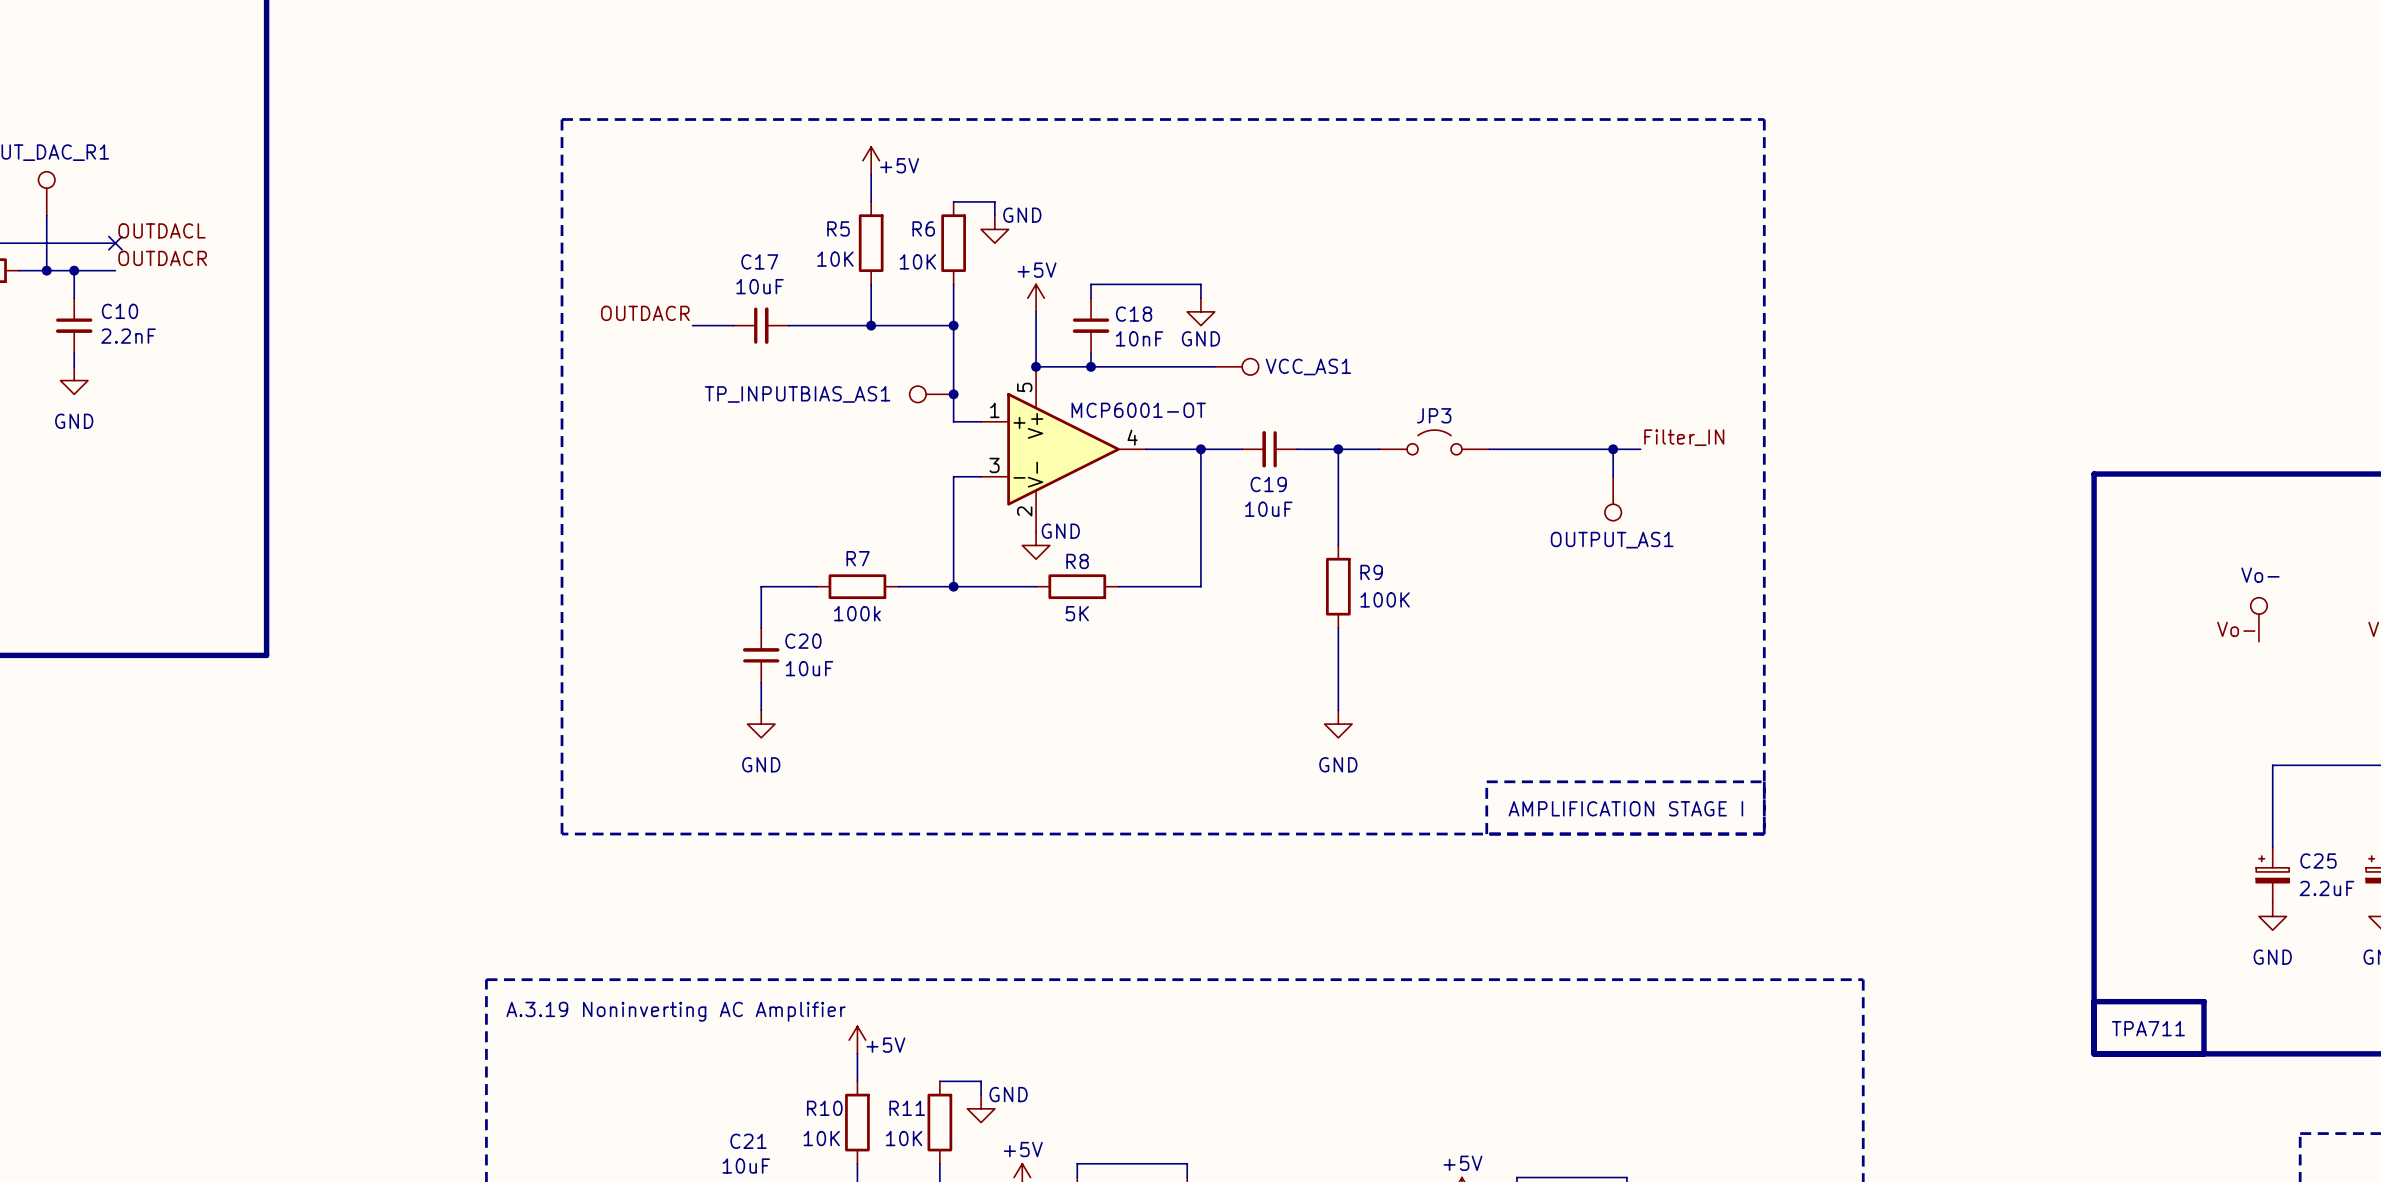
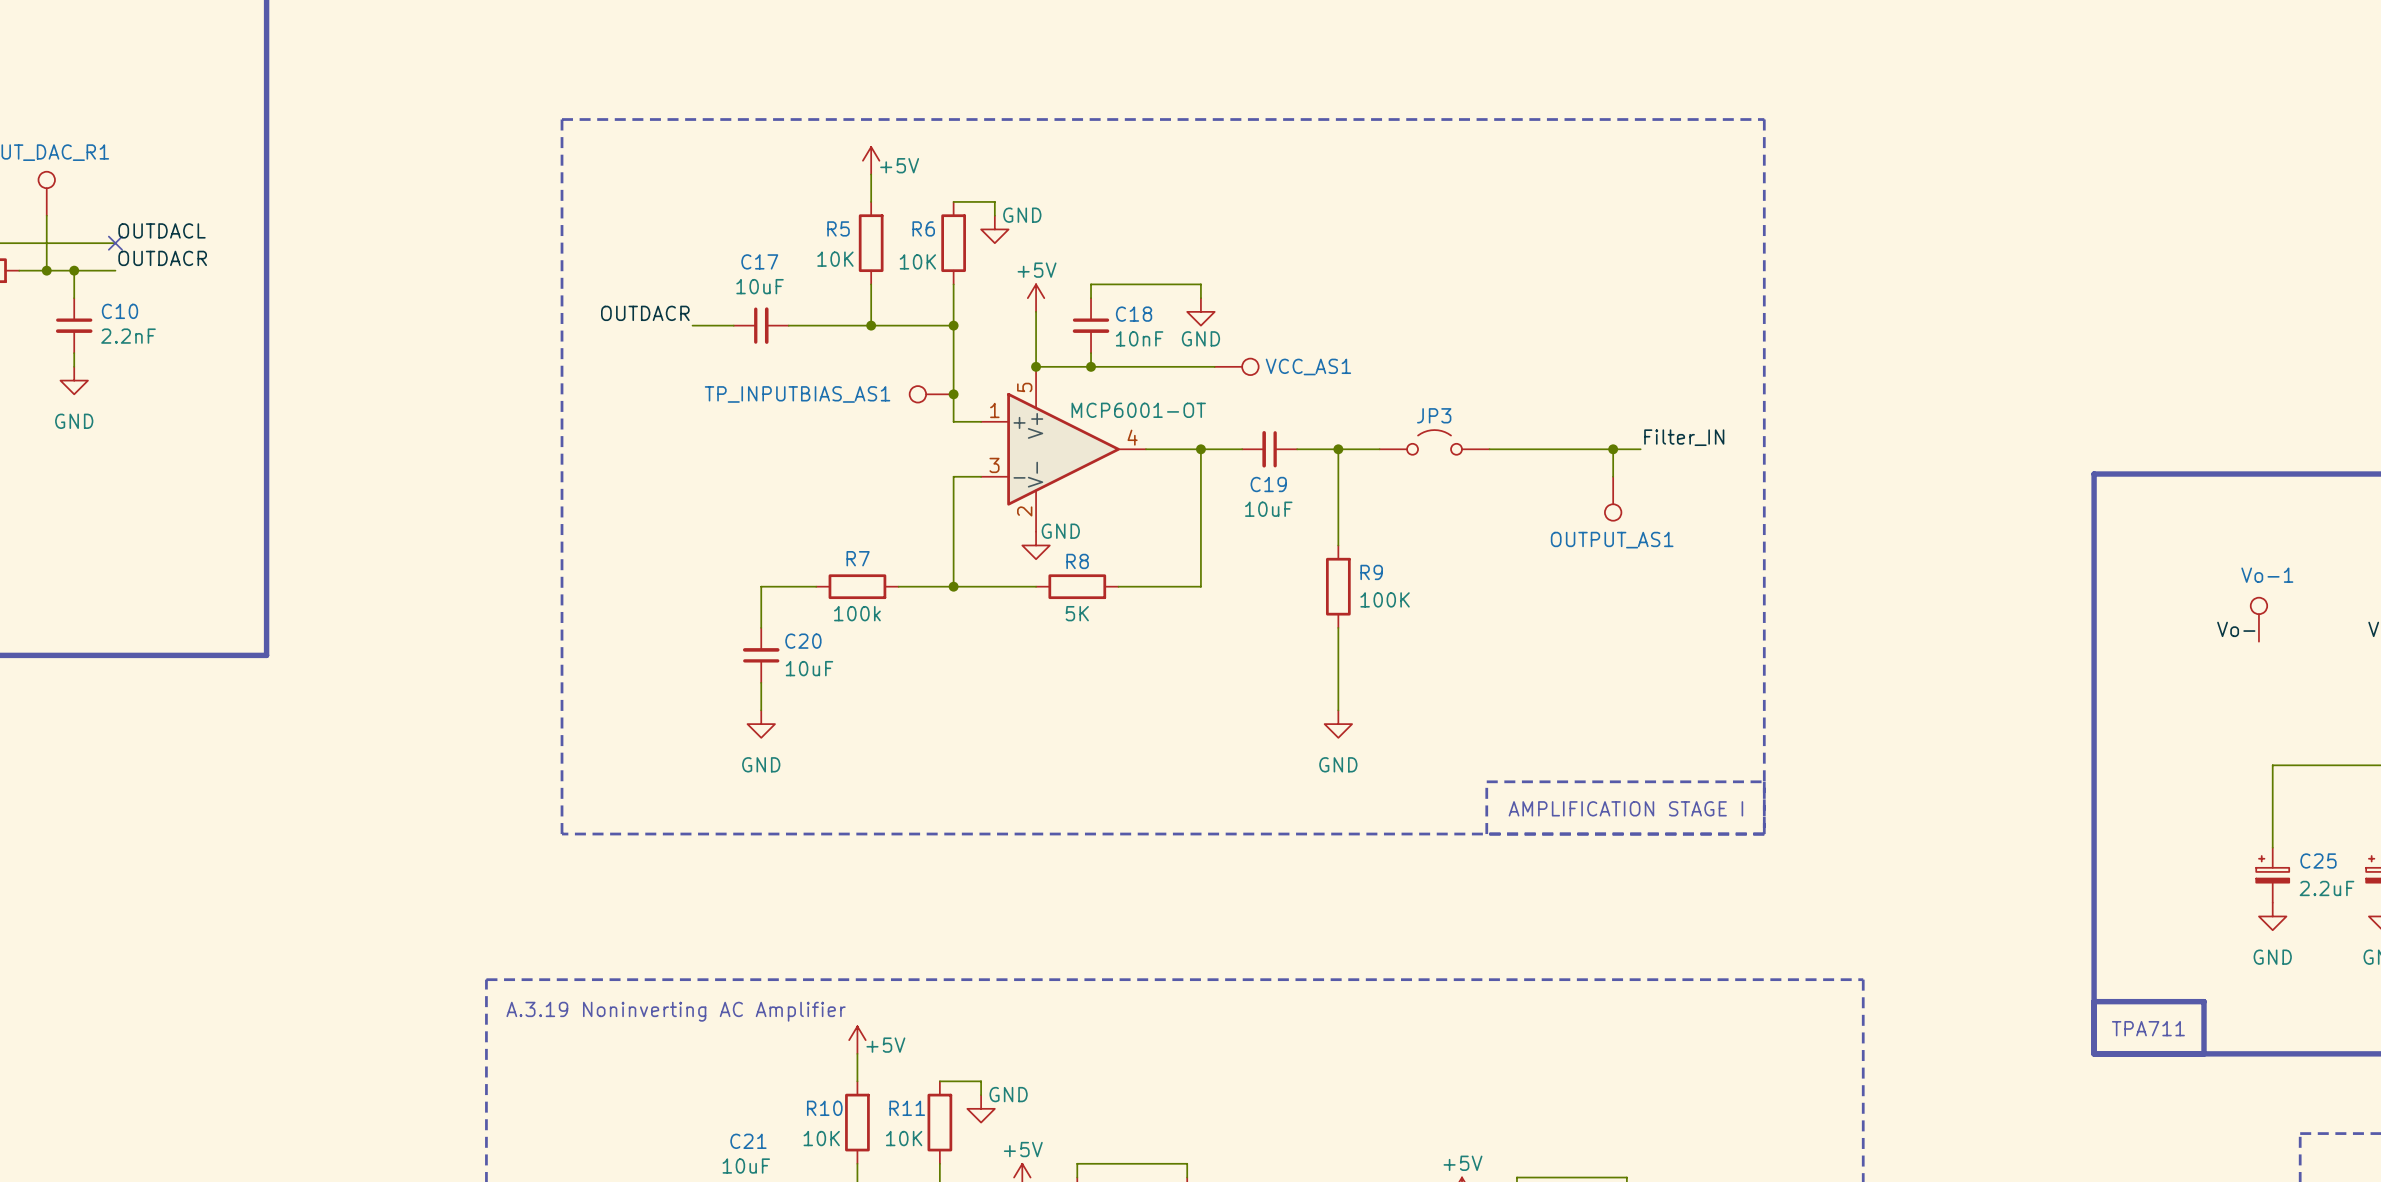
Vo- name: Vo- (2260, 575) -> Vo-1 (2267, 575)

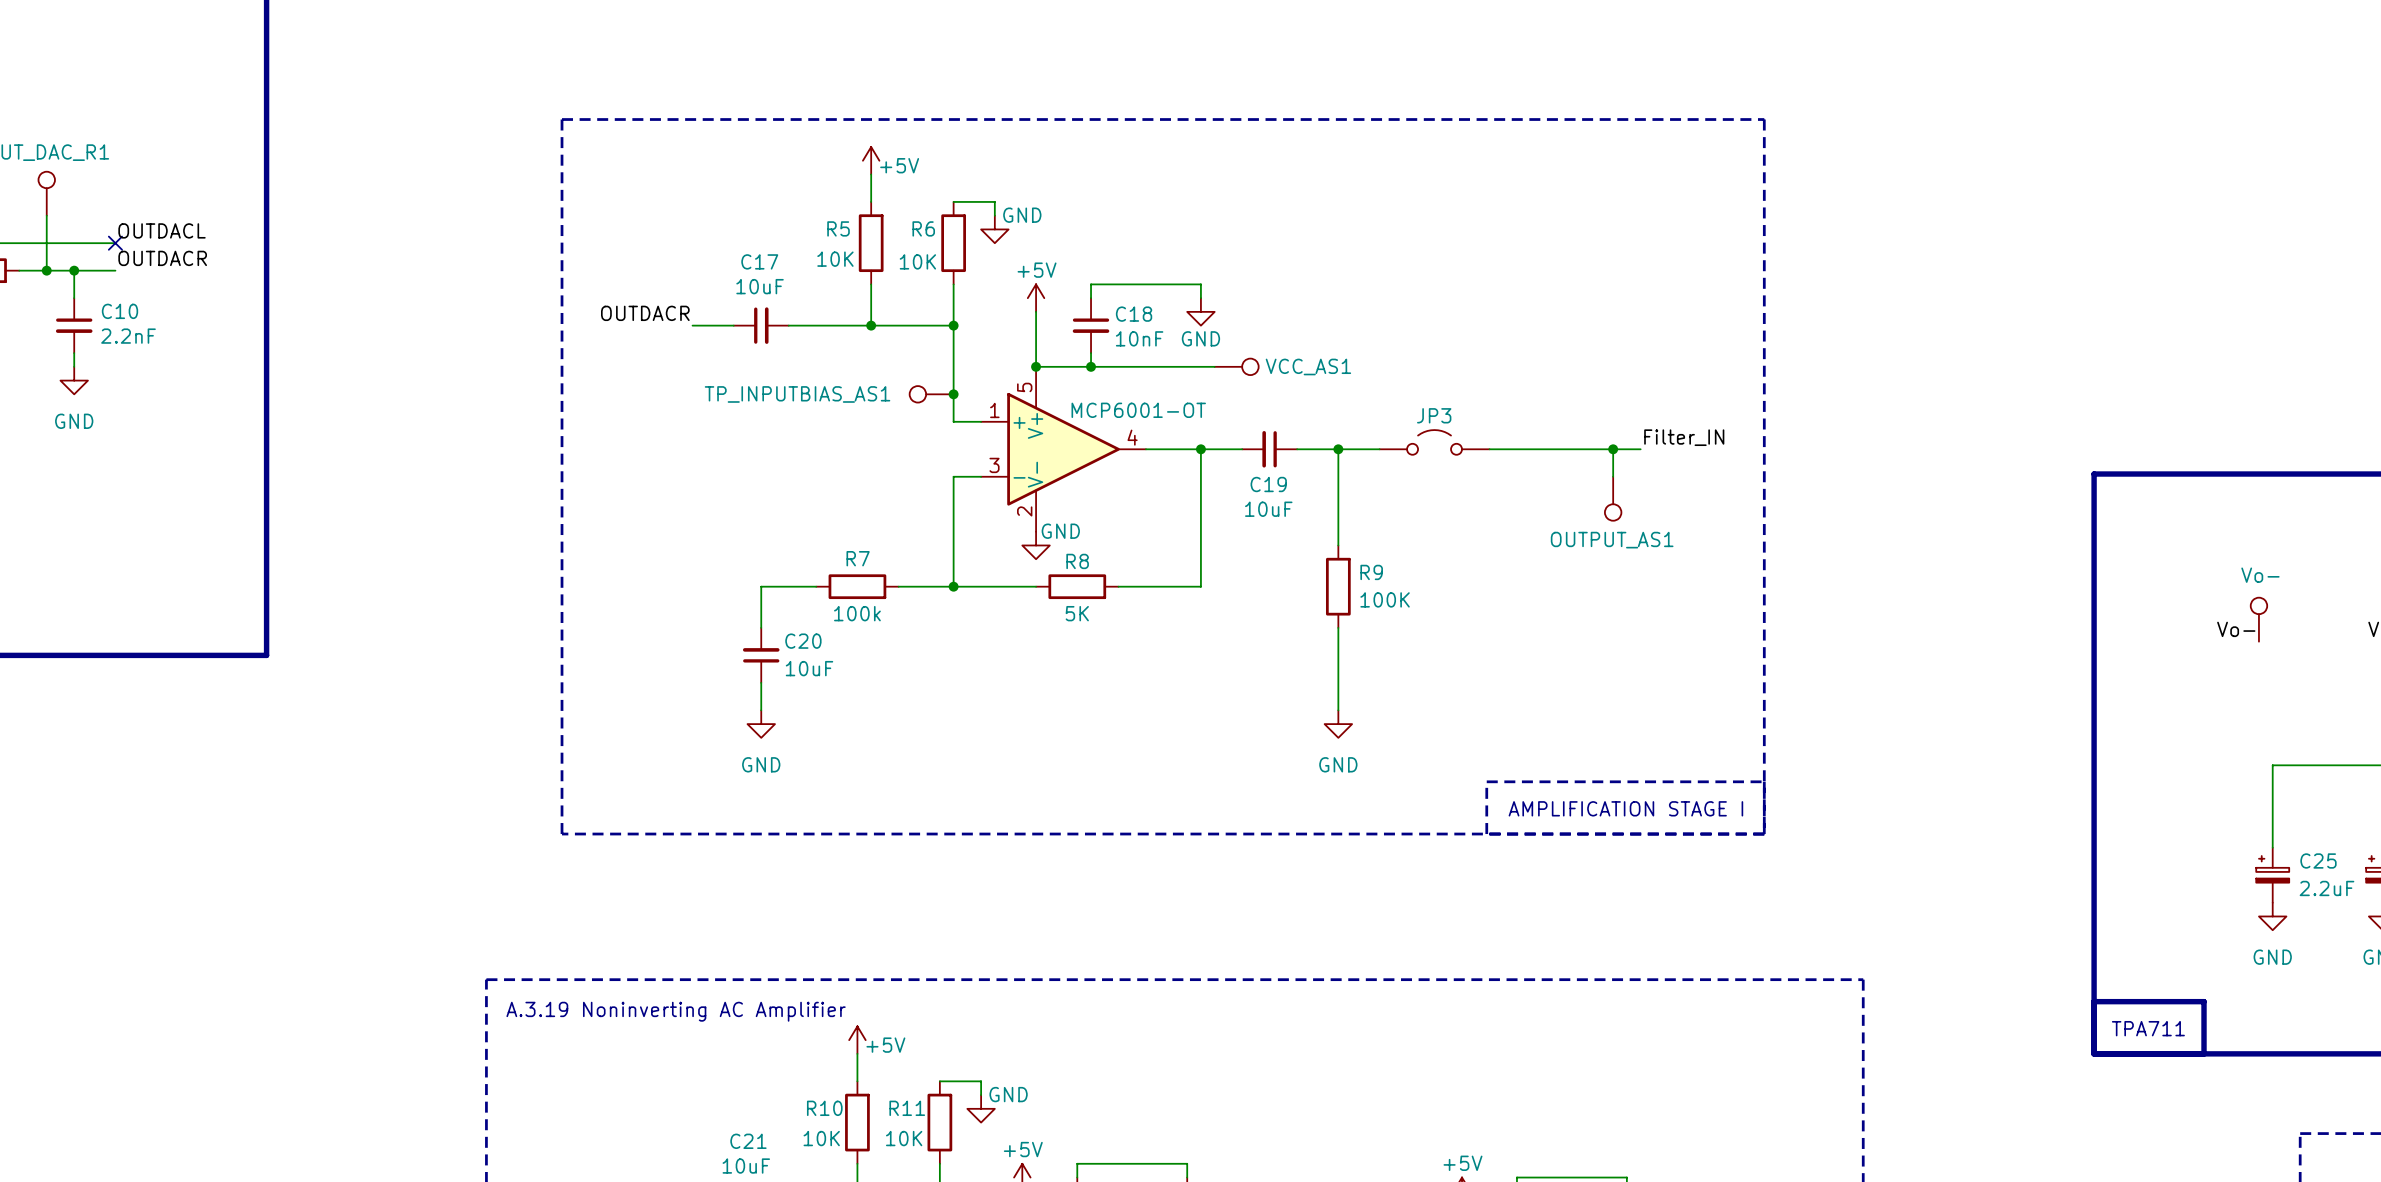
Vo-1 name: Vo-1 (2267, 575) -> Vo- (2260, 575)

